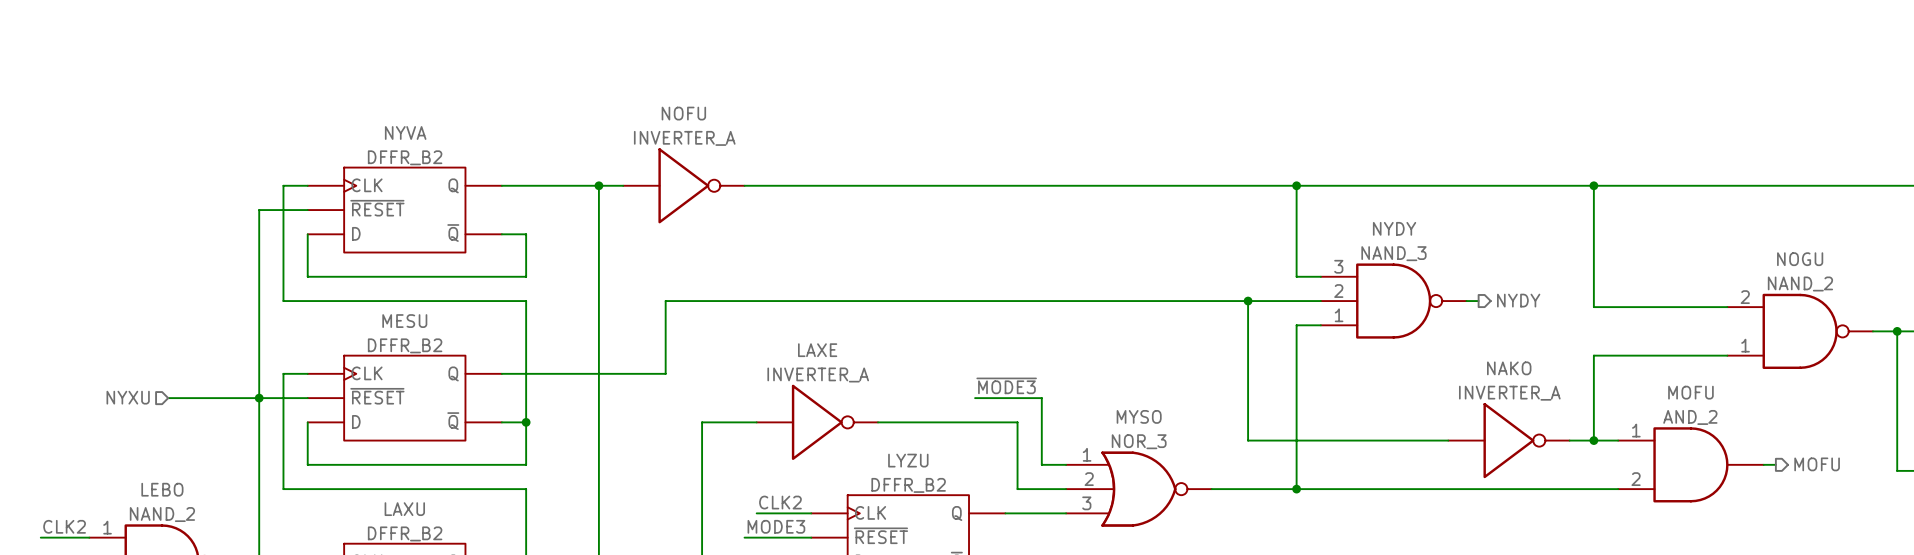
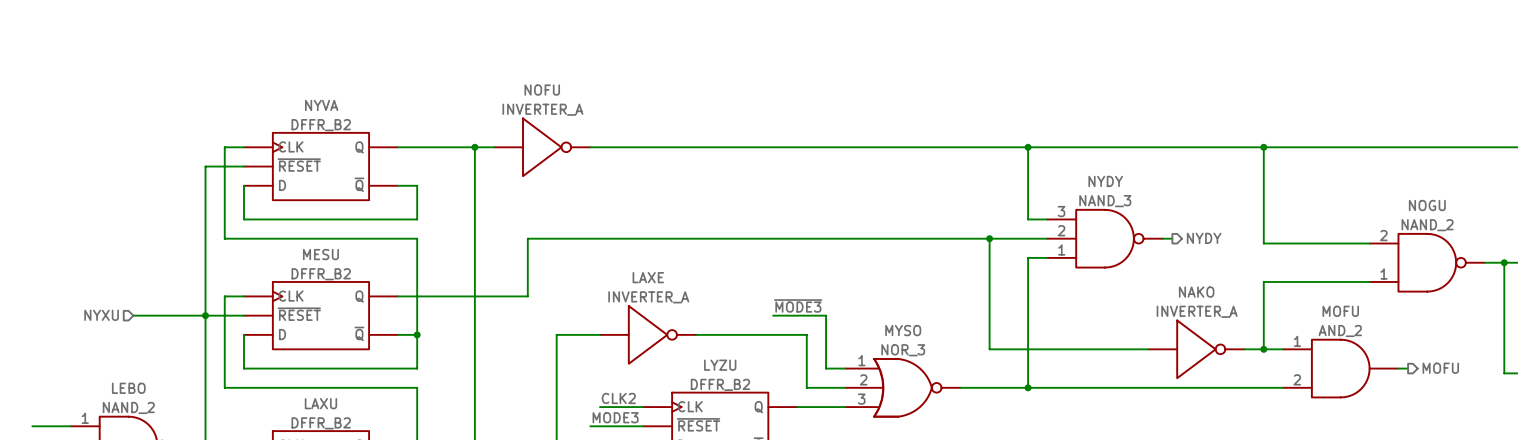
label: CLK2 (64, 526) -> none

